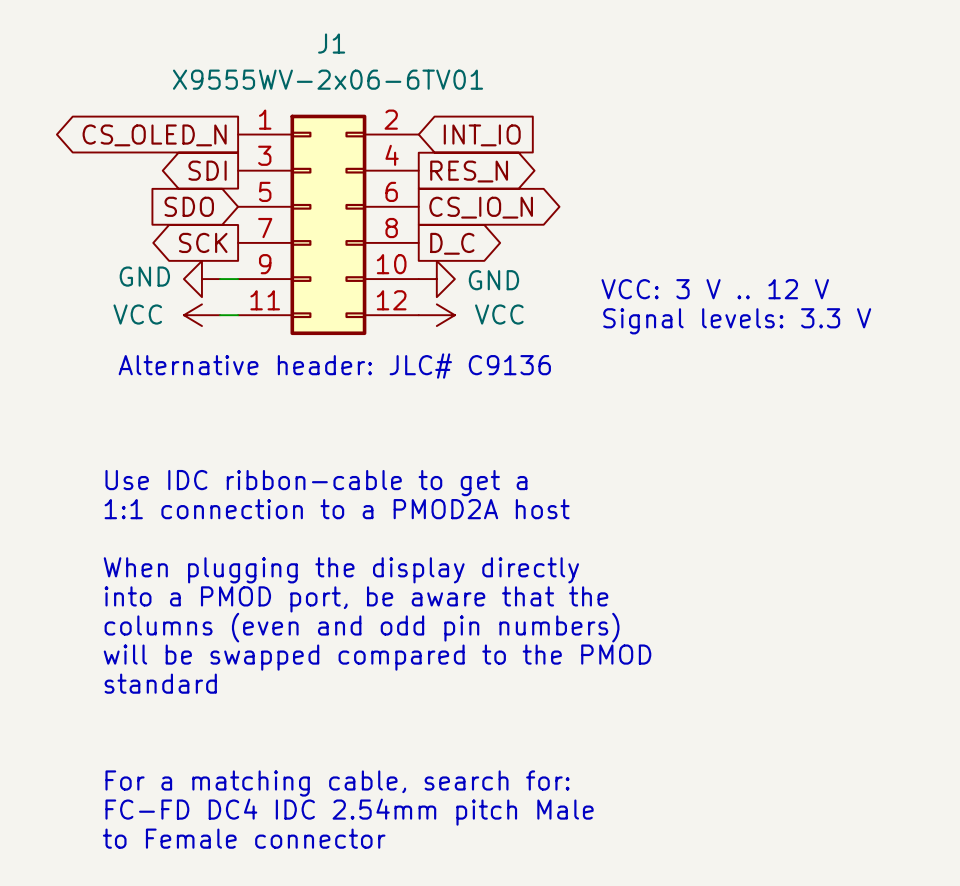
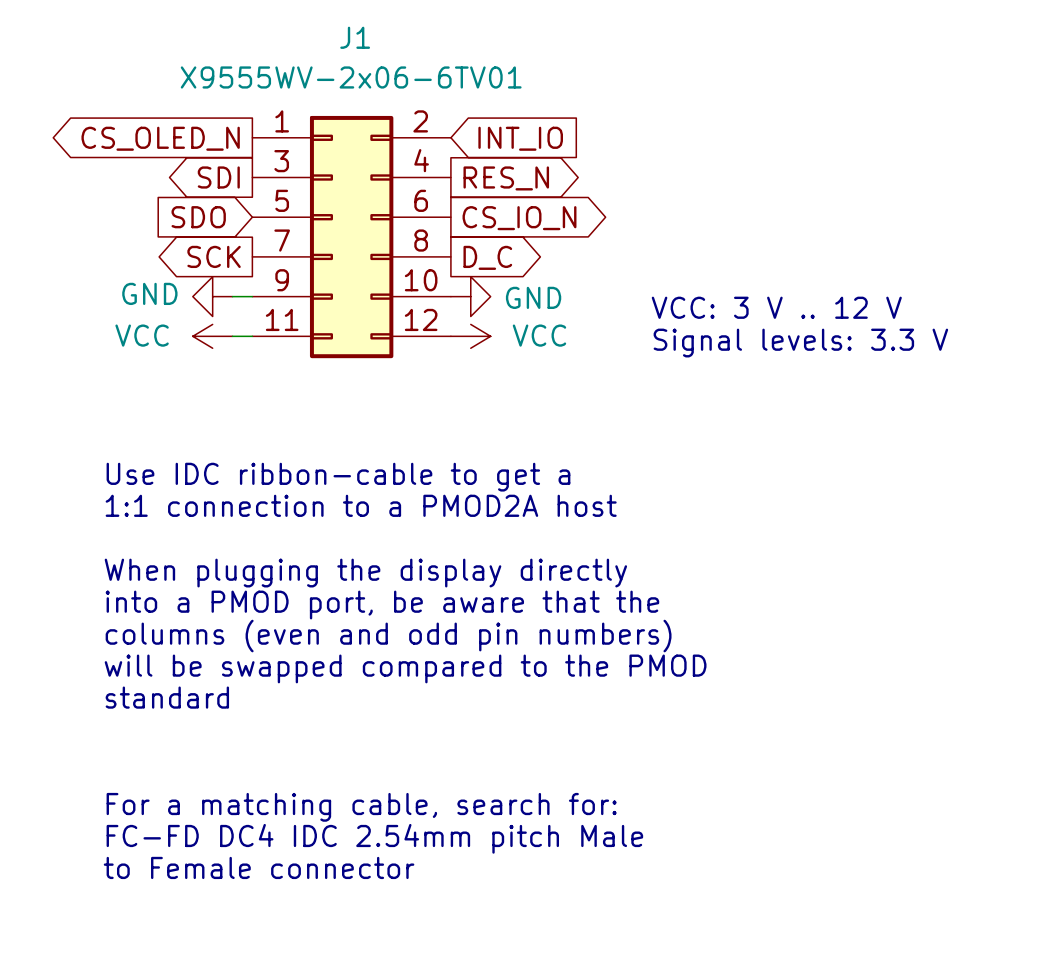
text: Alternative header: JLC# C9136 (334, 366) -> none
text position: Use IDC ribbon-cable to get a (316, 483) -> Use IDC ribbon-cable to get a (338, 477)
text position: 1:1 connection to a PMOD2A host (337, 509) -> 1:1 connection to a PMOD2A host (361, 505)
text position: When plugging the display directly (341, 570) -> When plugging the display directly (365, 573)
text position: into a PMOD port, be aware that the (356, 599) -> into a PMOD port, be aware that the (382, 605)
text position: columns (even and odd pin numbers) (362, 627) -> columns (even and odd pin numbers) (388, 636)
text position: will be swapped compared to the PMOD (377, 657) -> will be swapped compared to the PMOD (405, 668)
text position: standard (160, 683) -> standard (167, 697)
text position: For a matching cable, search for: (337, 783) -> For a matching cable, search for: (361, 807)
text position: FC-FD DC4 IDC 2.54mm pitch Male (349, 812) -> FC-FD DC4 IDC 2.54mm pitch Male (374, 838)
text position: to Female connector (244, 838) -> to Female connector (259, 867)

